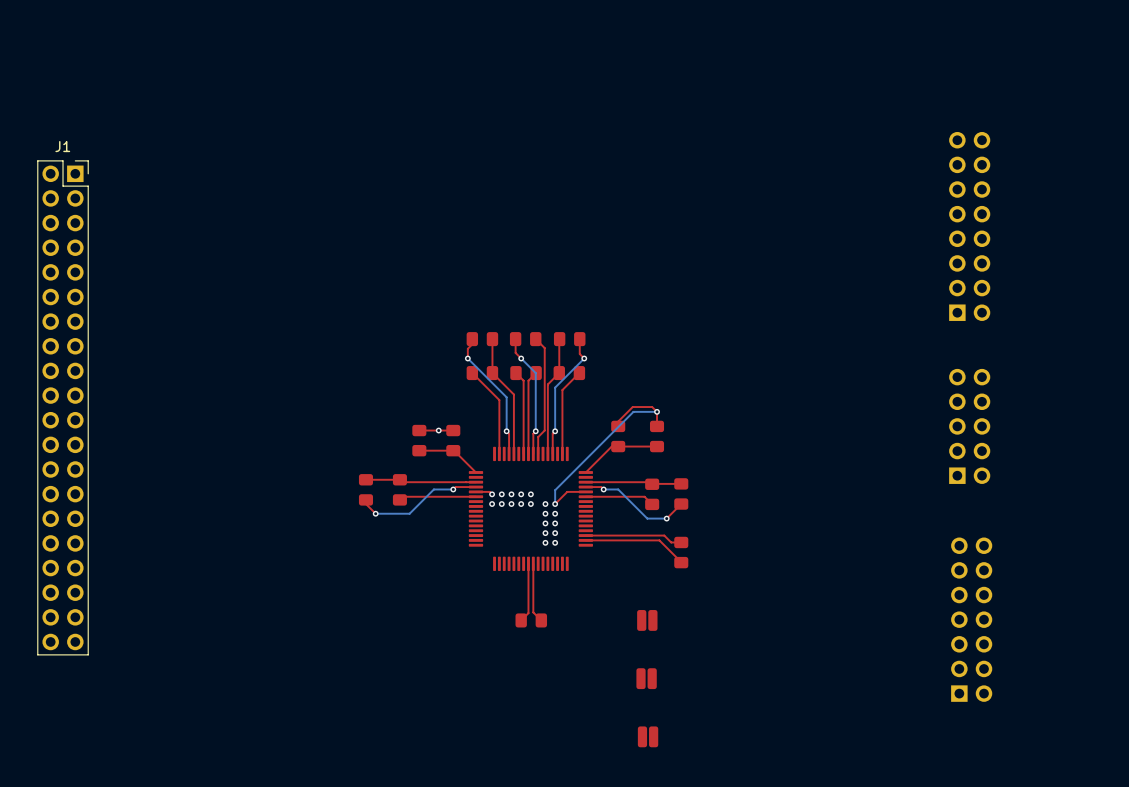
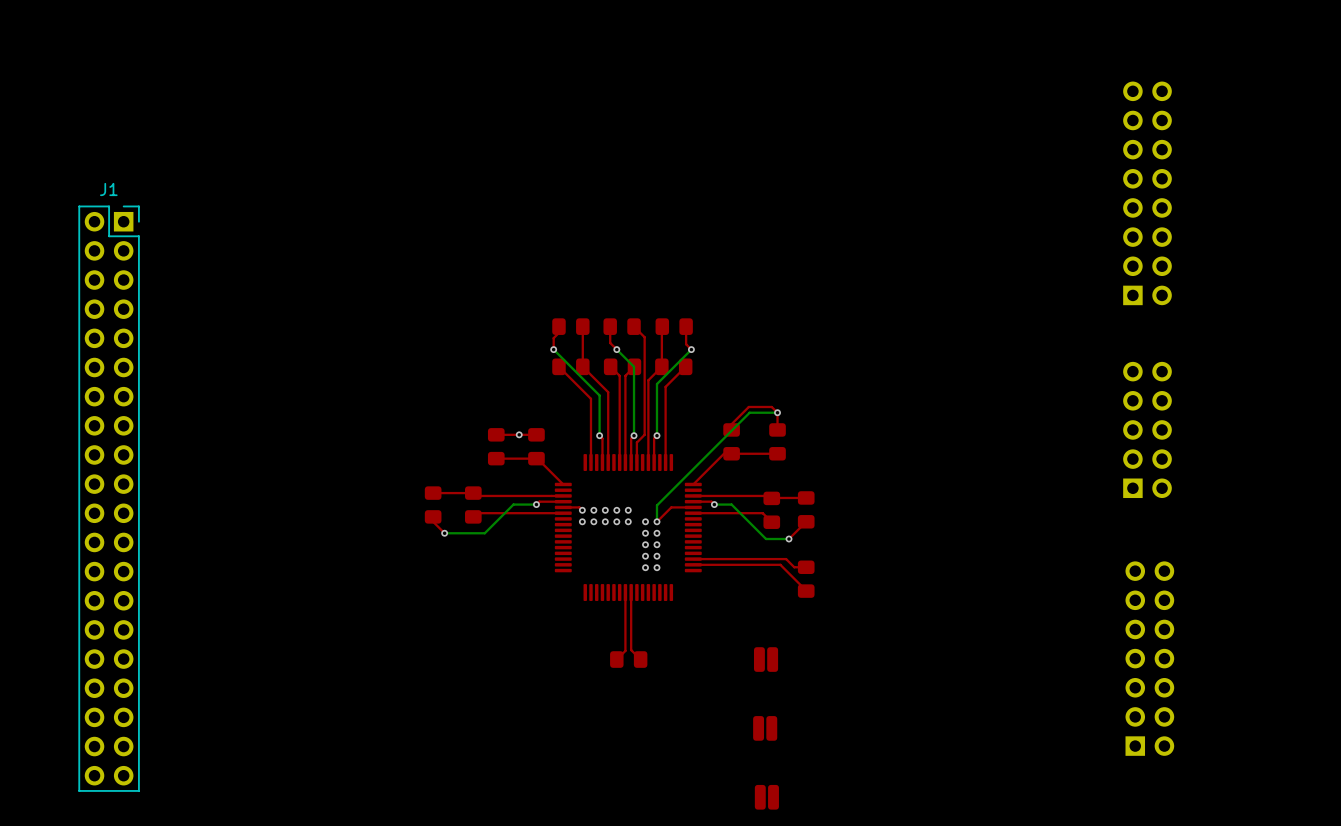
J1 position: (63, 407) -> (109, 498)

